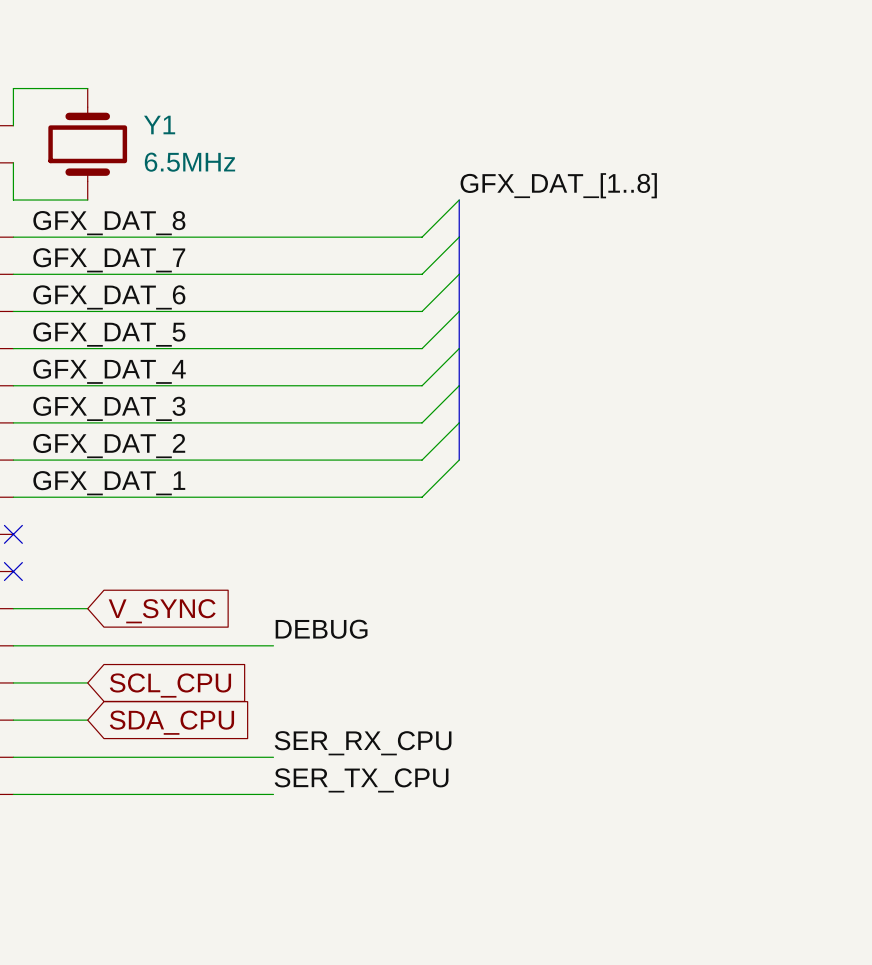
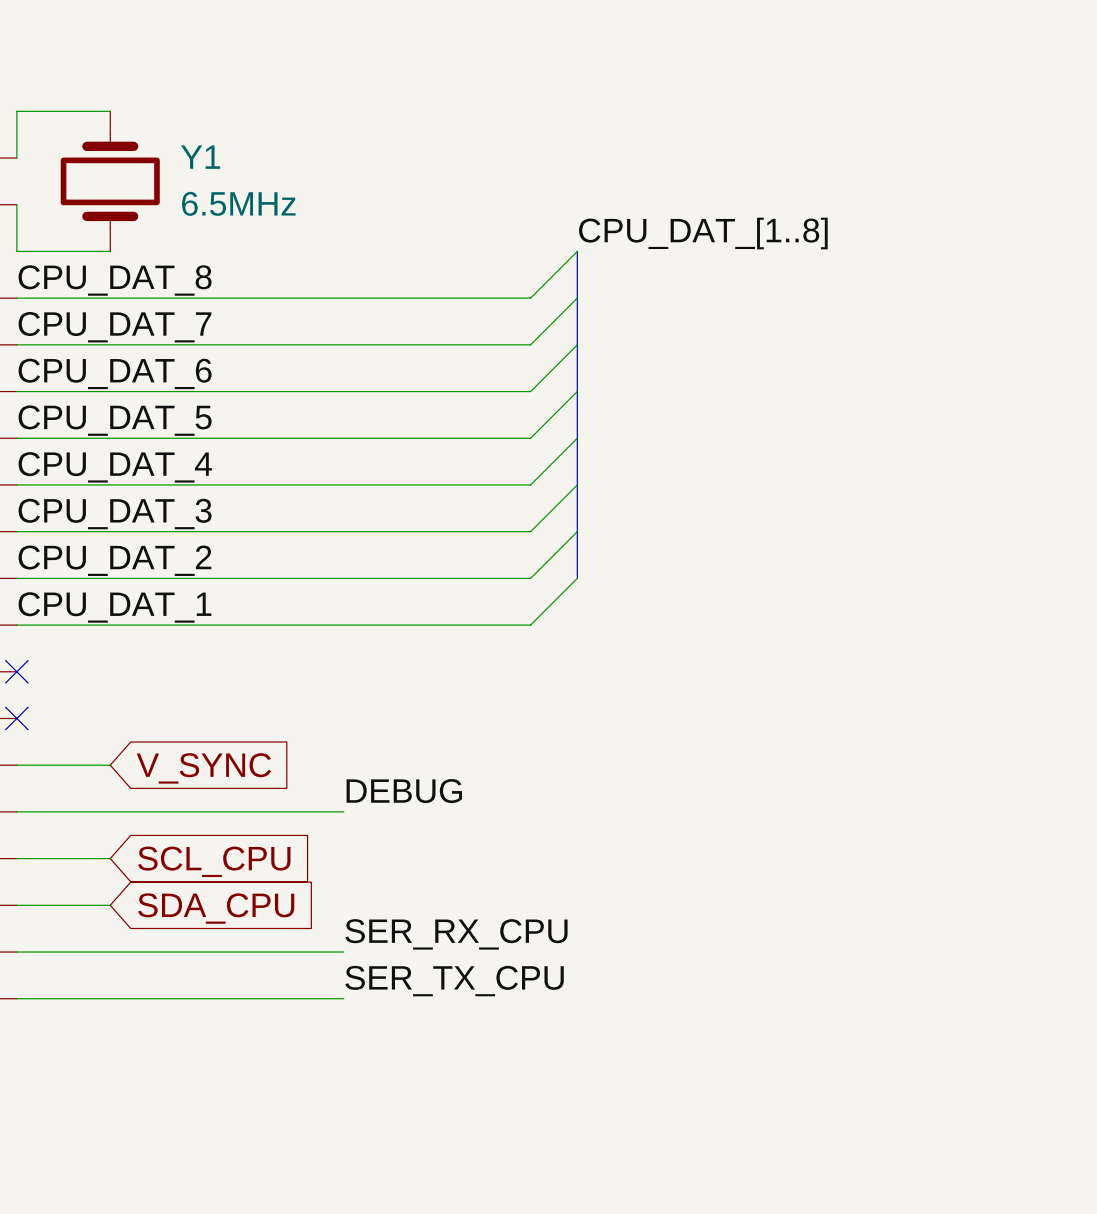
label: GFX_DAT_[1..8] (558, 185) -> CPU_DAT_[1..8] (703, 233)
label: GFX_DAT_8 (109, 223) -> CPU_DAT_8 (115, 280)
label: GFX_DAT_7 (109, 260) -> CPU_DAT_7 (114, 327)
label: GFX_DAT_6 (109, 297) -> CPU_DAT_6 (115, 373)
label: GFX_DAT_5 (109, 334) -> CPU_DAT_5 (115, 420)
label: GFX_DAT_4 (109, 371) -> CPU_DAT_4 (115, 467)
label: GFX_DAT_3 (109, 408) -> CPU_DAT_3 (115, 514)
label: GFX_DAT_2 (109, 446) -> CPU_DAT_2 (114, 560)
label: GFX_DAT_1 (109, 483) -> CPU_DAT_1 (114, 607)

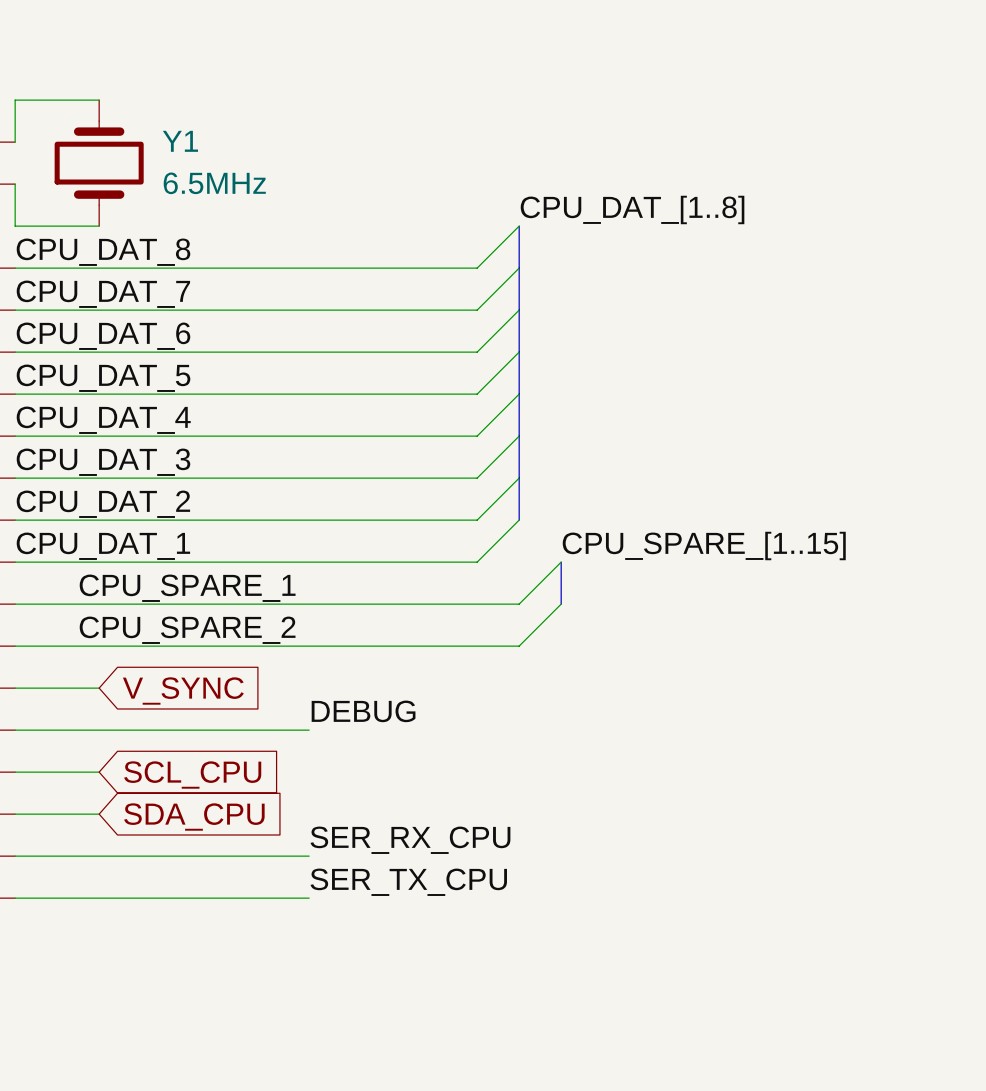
label: none -> CPU_SPARE_[1..15] (704, 545)
wire: none -> (561, 562) (519, 604) (15, 604)
bus: none -> (561, 562) (561, 604)
label: none -> CPU_SPARE_1 (187, 588)
no-connect mark: (16, 671) -> none
wire: none -> (561, 604) (519, 646) (15, 646)
label: none -> CPU_SPARE_2 (187, 630)
no-connect mark: (16, 718) -> none

